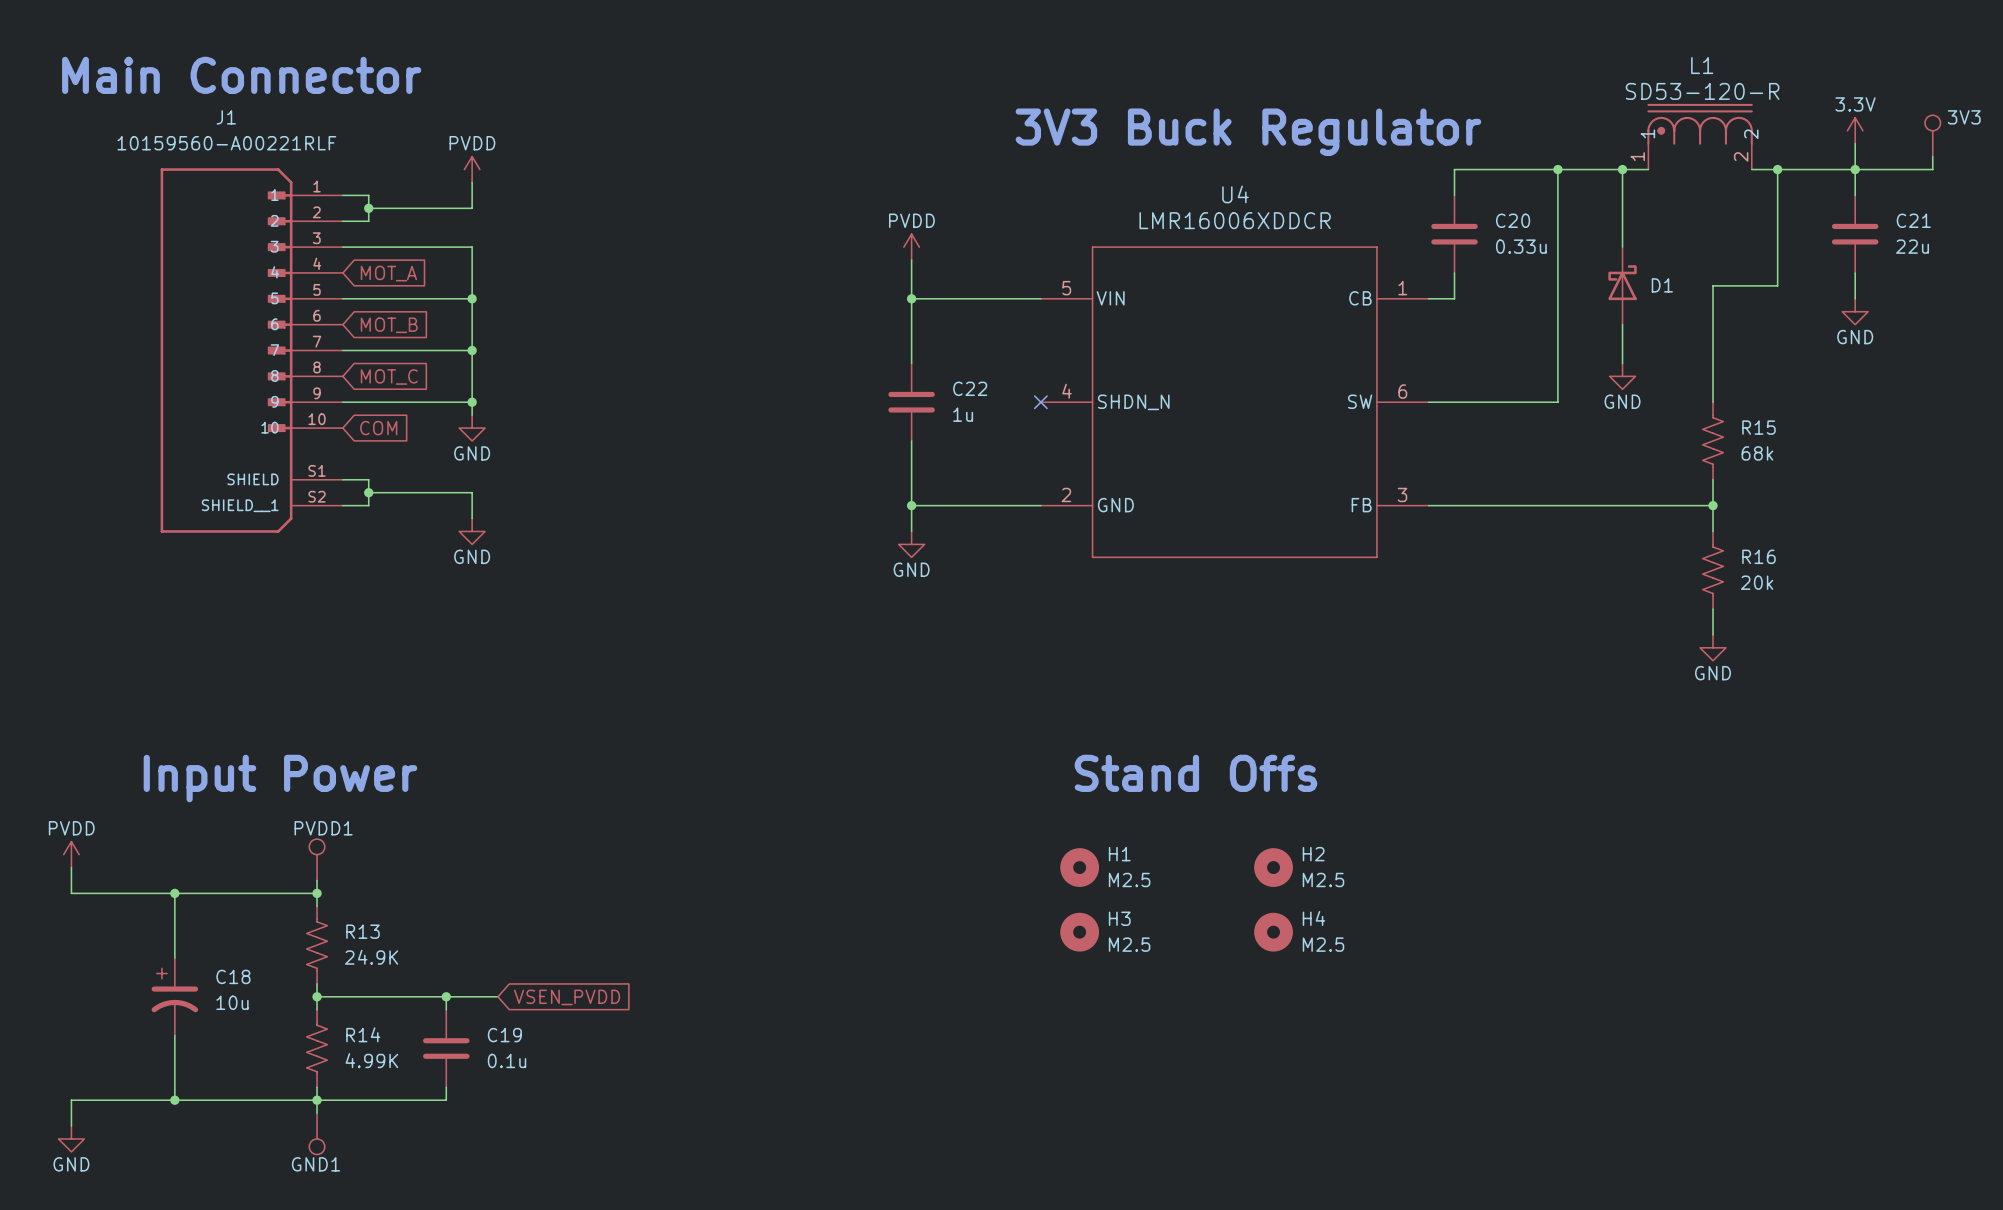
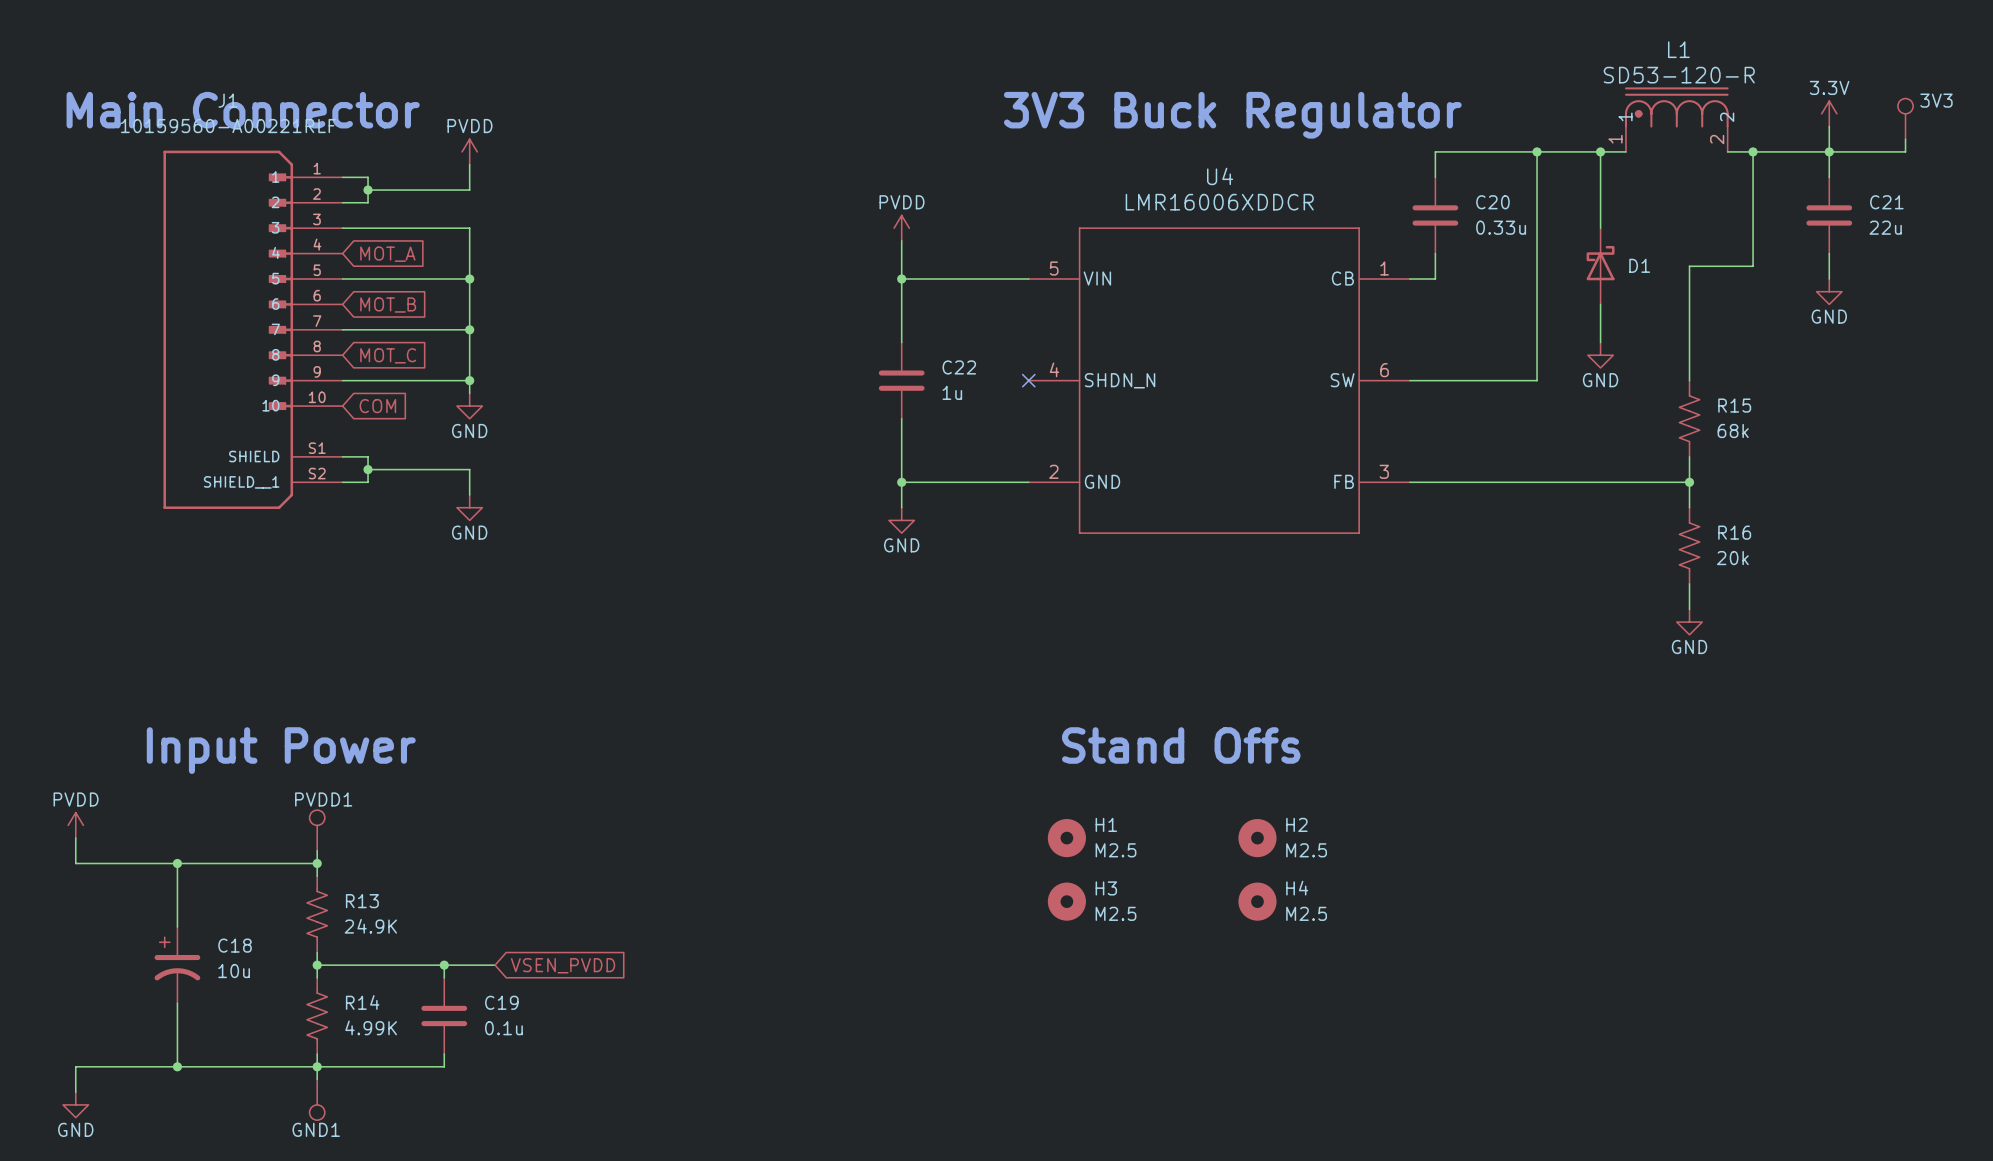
text position: Main Connector (241, 75) -> Main Connector (243, 110)

